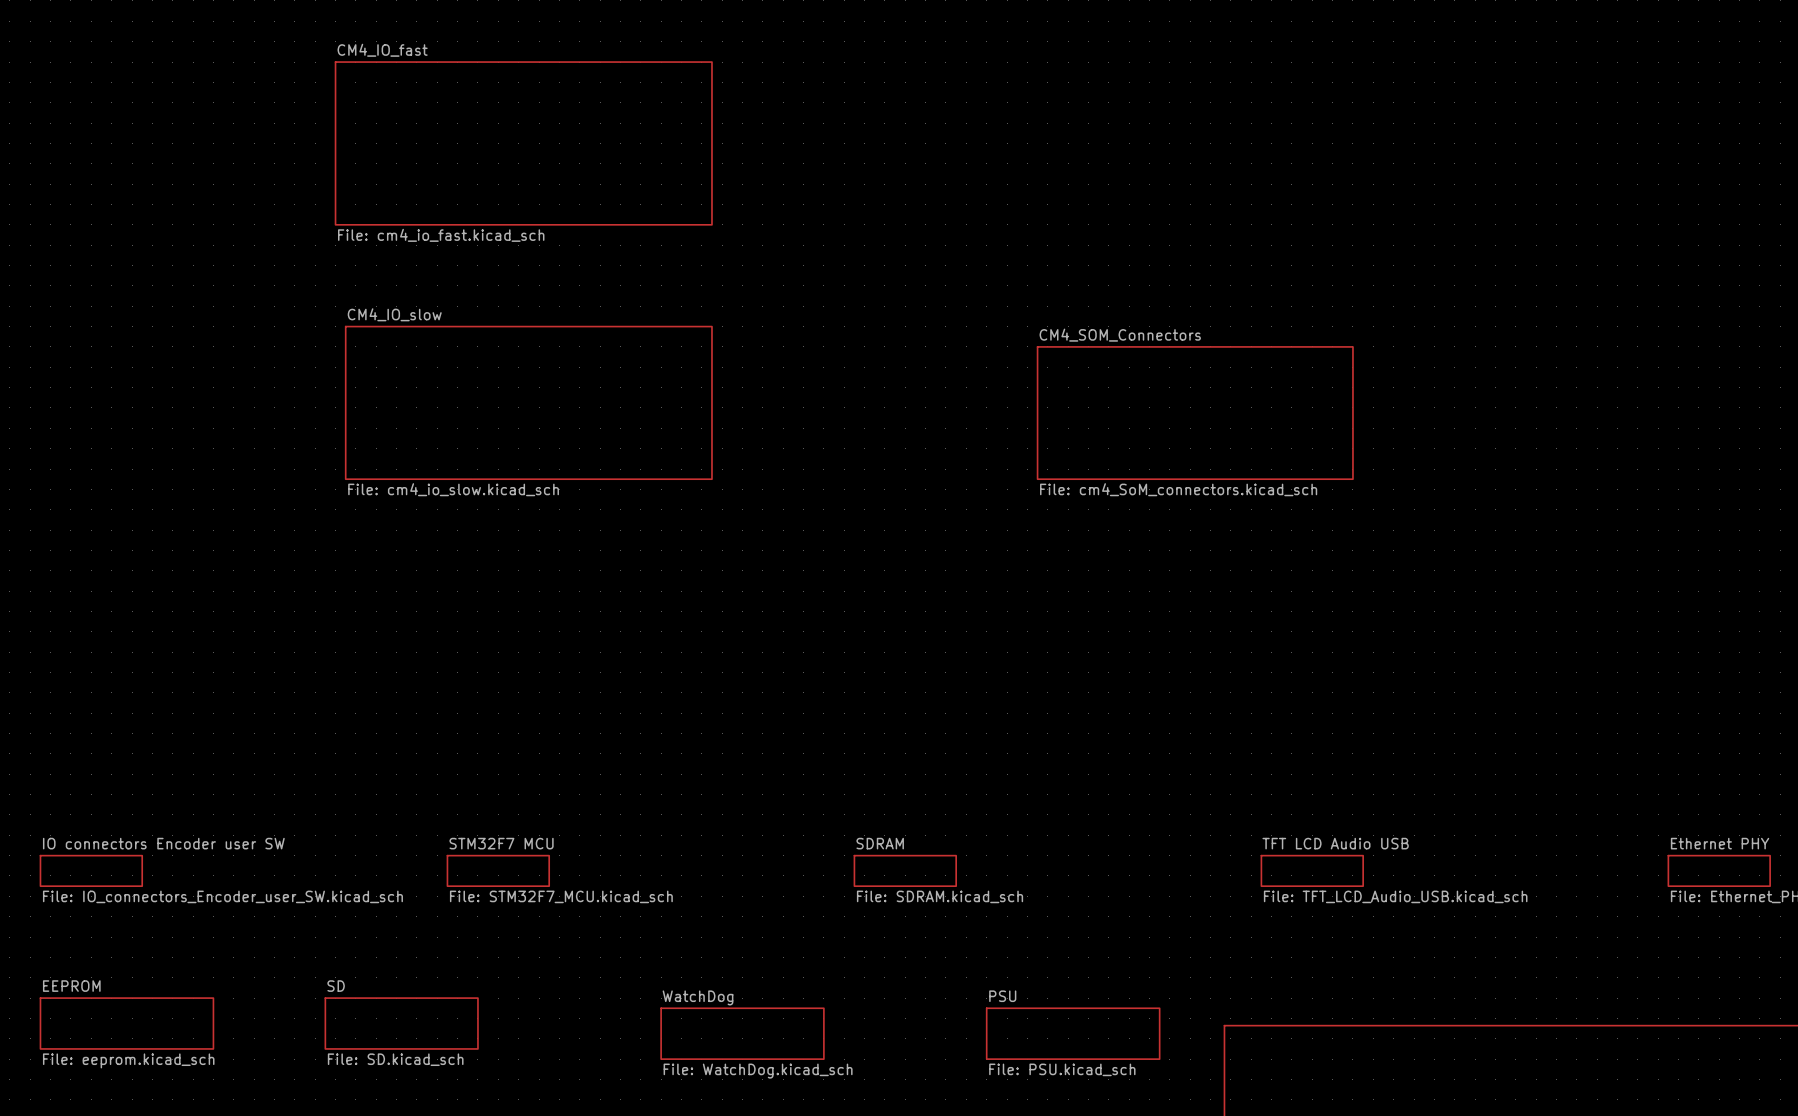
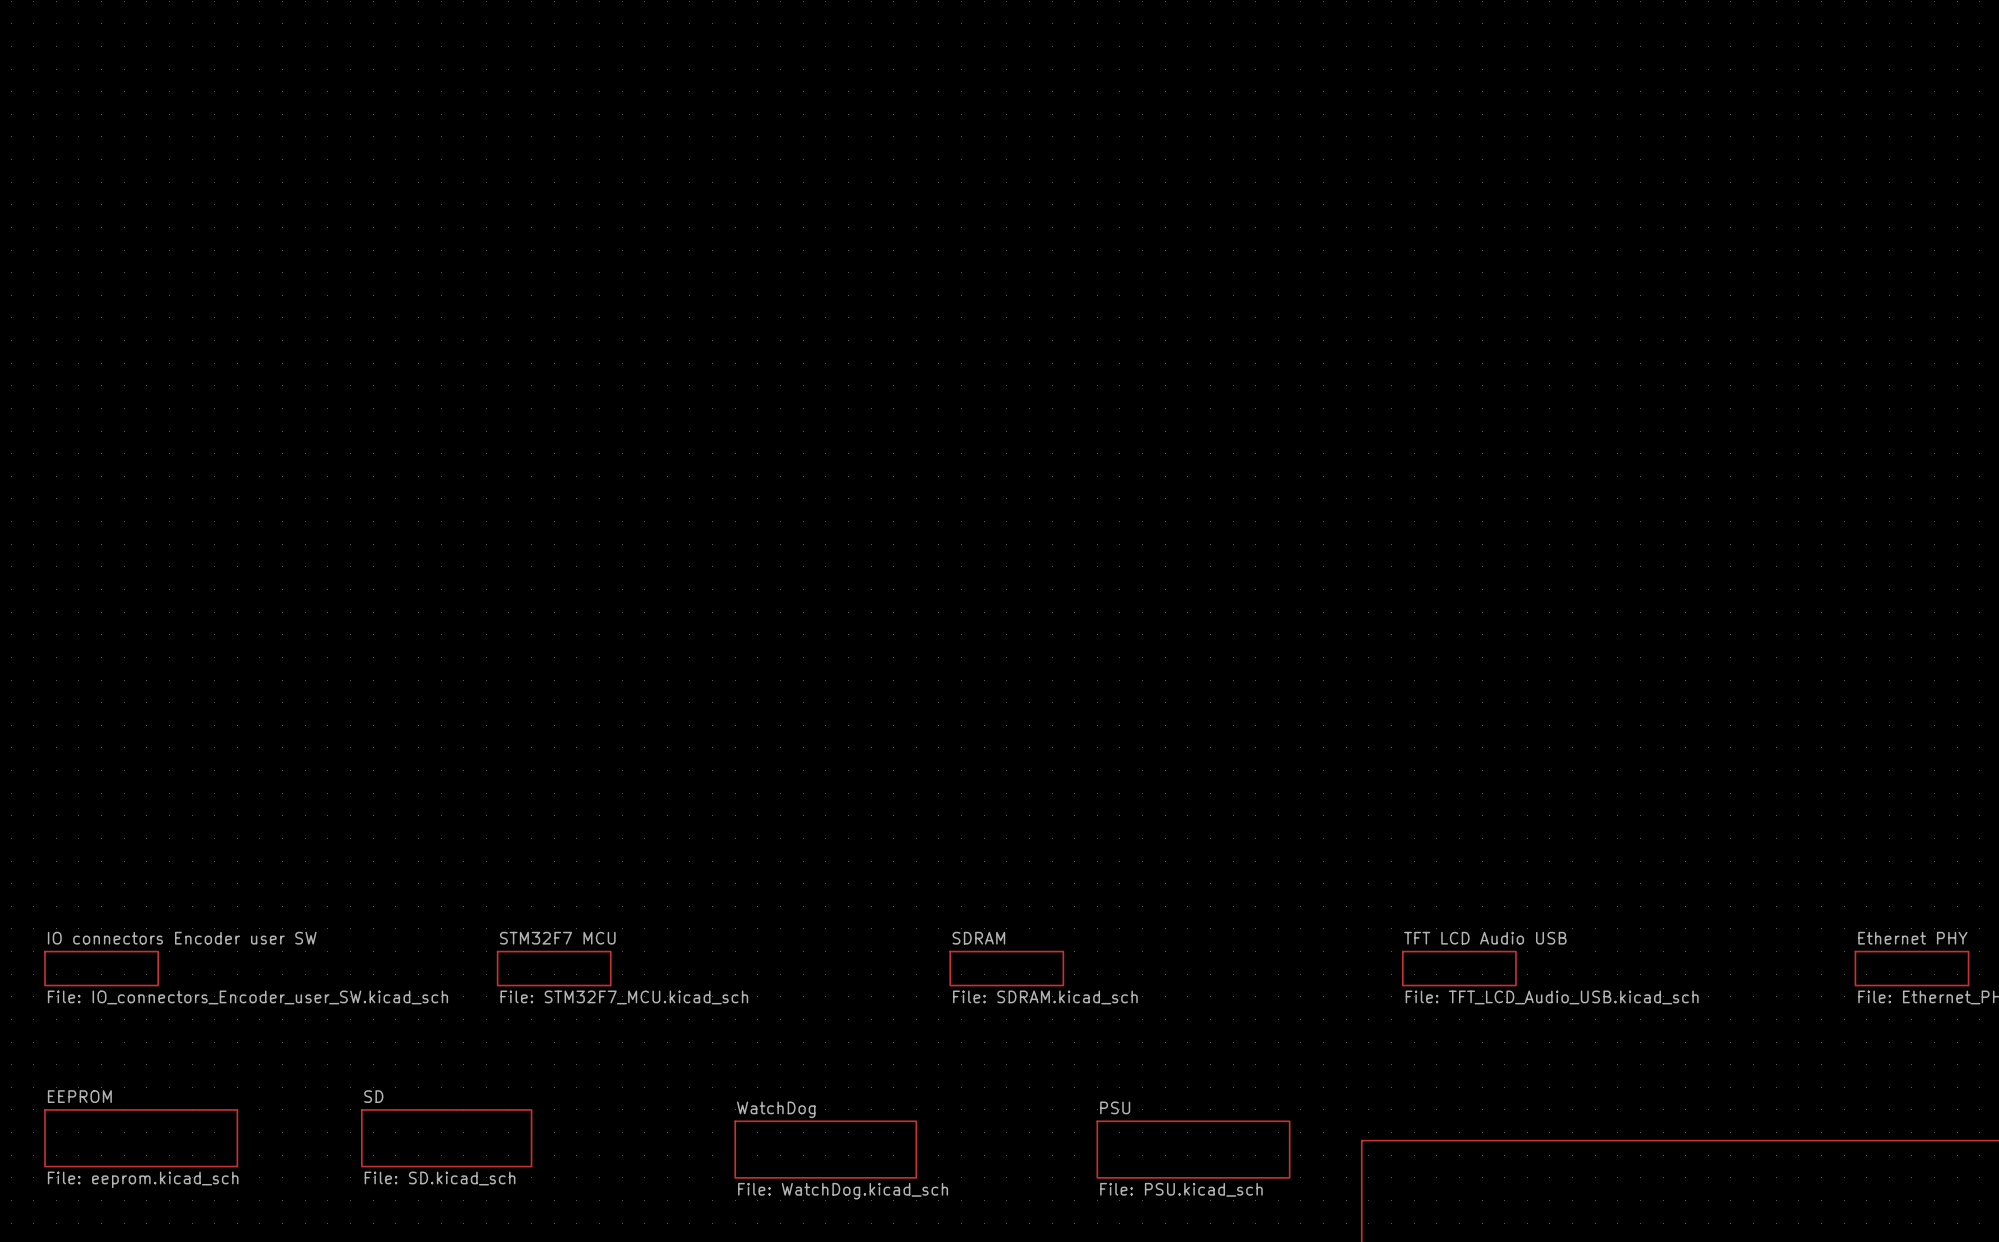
sheet CM4_IO_fast: File: cm4_io_fast.kicad_sch (523, 143) -> none
sheet CM4_IO_slow: File: cm4_io_slow.kicad_sch (528, 402) -> none
sheet CM4_SOM_Connectors: File: cm4_SoM_connectors.kicad_sch (1195, 413) -> none

